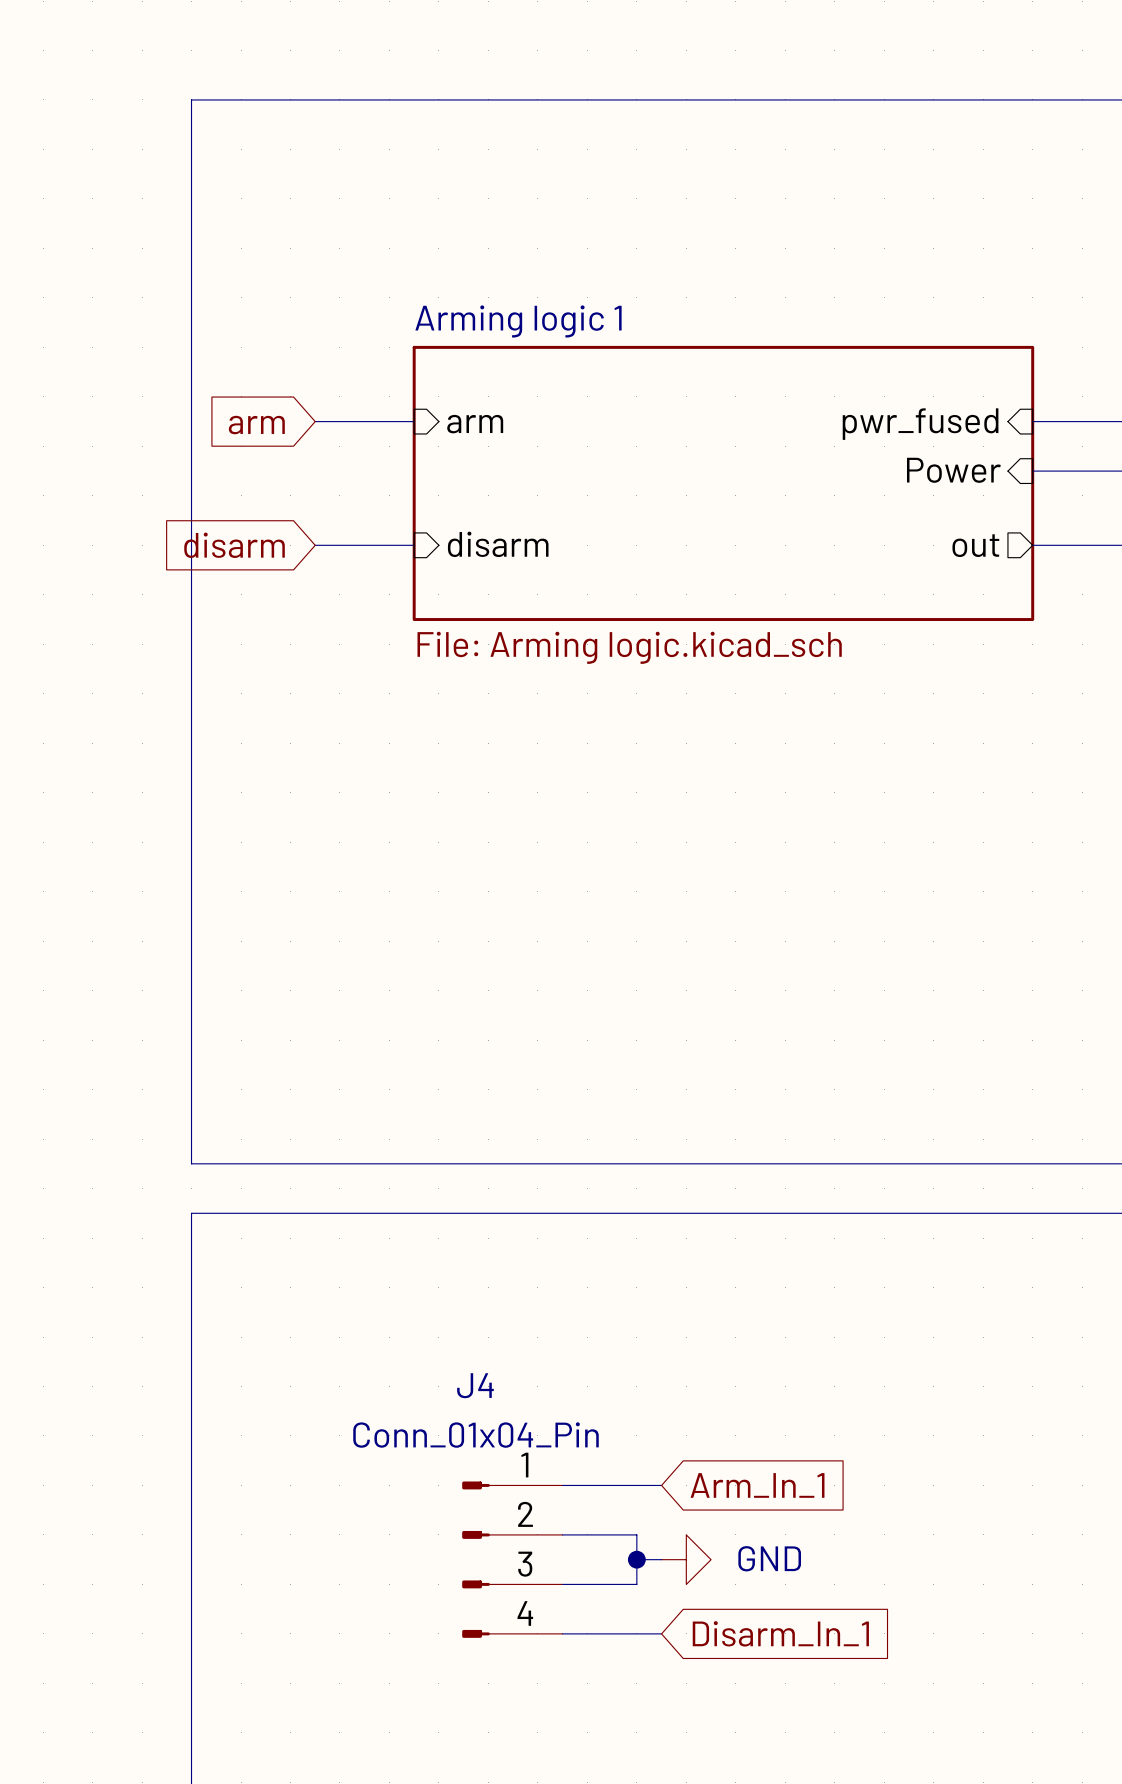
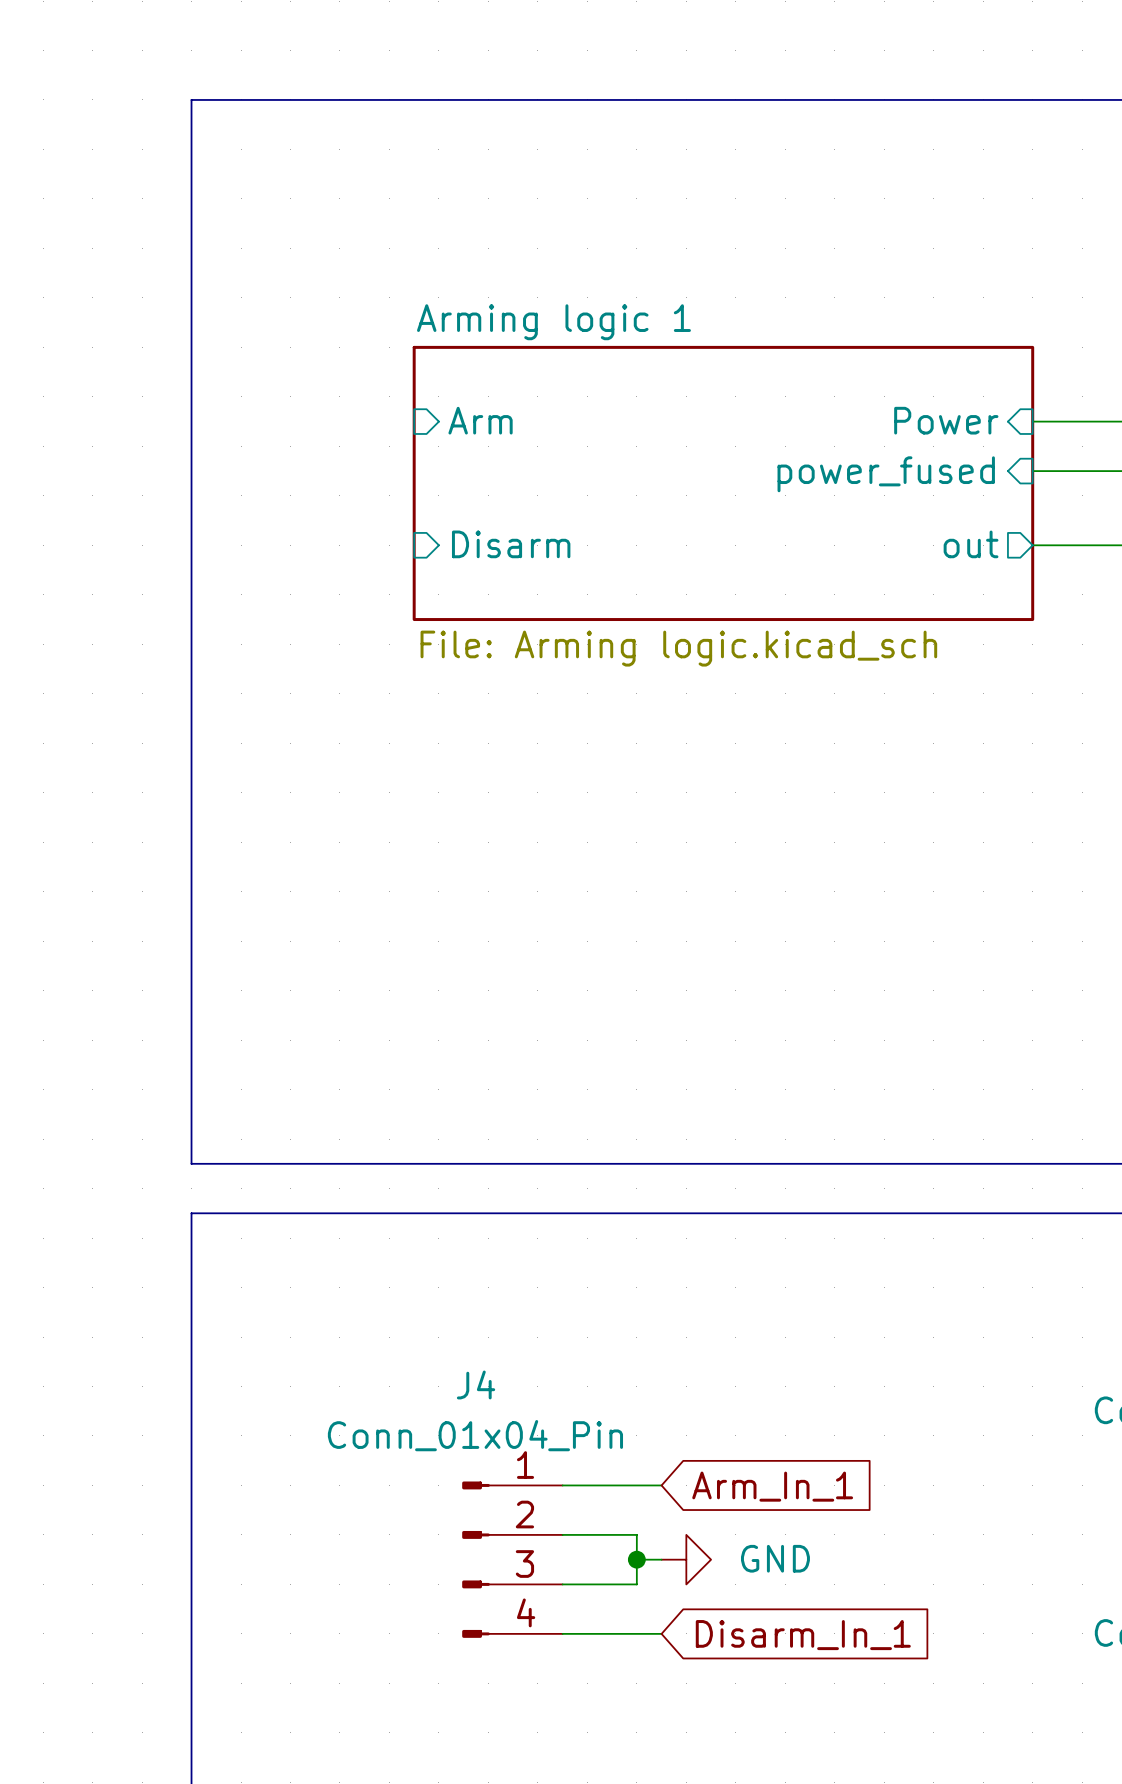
wire: (315, 421) (414, 421) -> none
sheet pin: arm (475, 424) -> Arm (480, 420)
sheet pin: pwr_fused (920, 424) -> Power (946, 420)
global label: arm (256, 425) -> none
sheet pin: Power (953, 470) -> power_fused (886, 474)
sheet pin: disarm (498, 544) -> Disarm (511, 544)
global label: disarm (234, 545) -> none
wire: (315, 545) (414, 545) -> none

